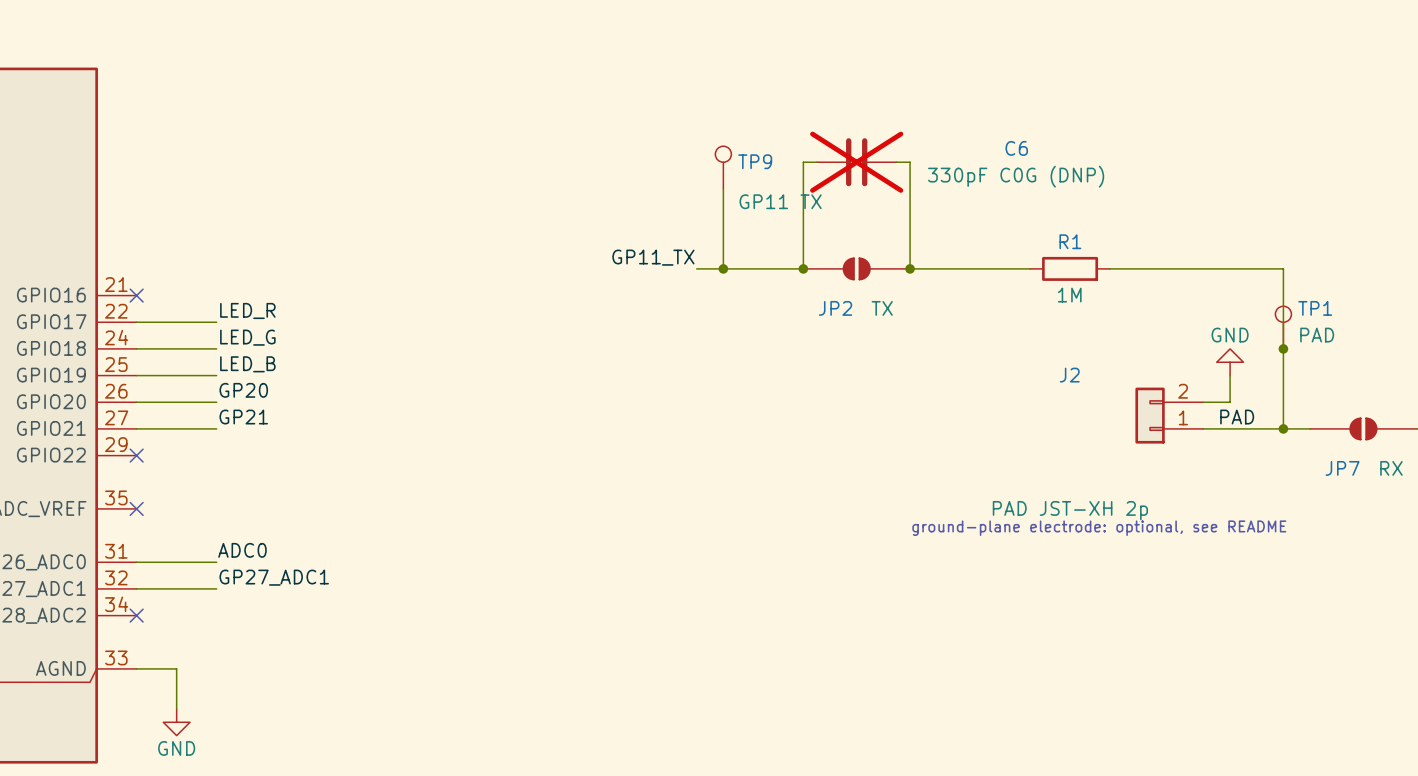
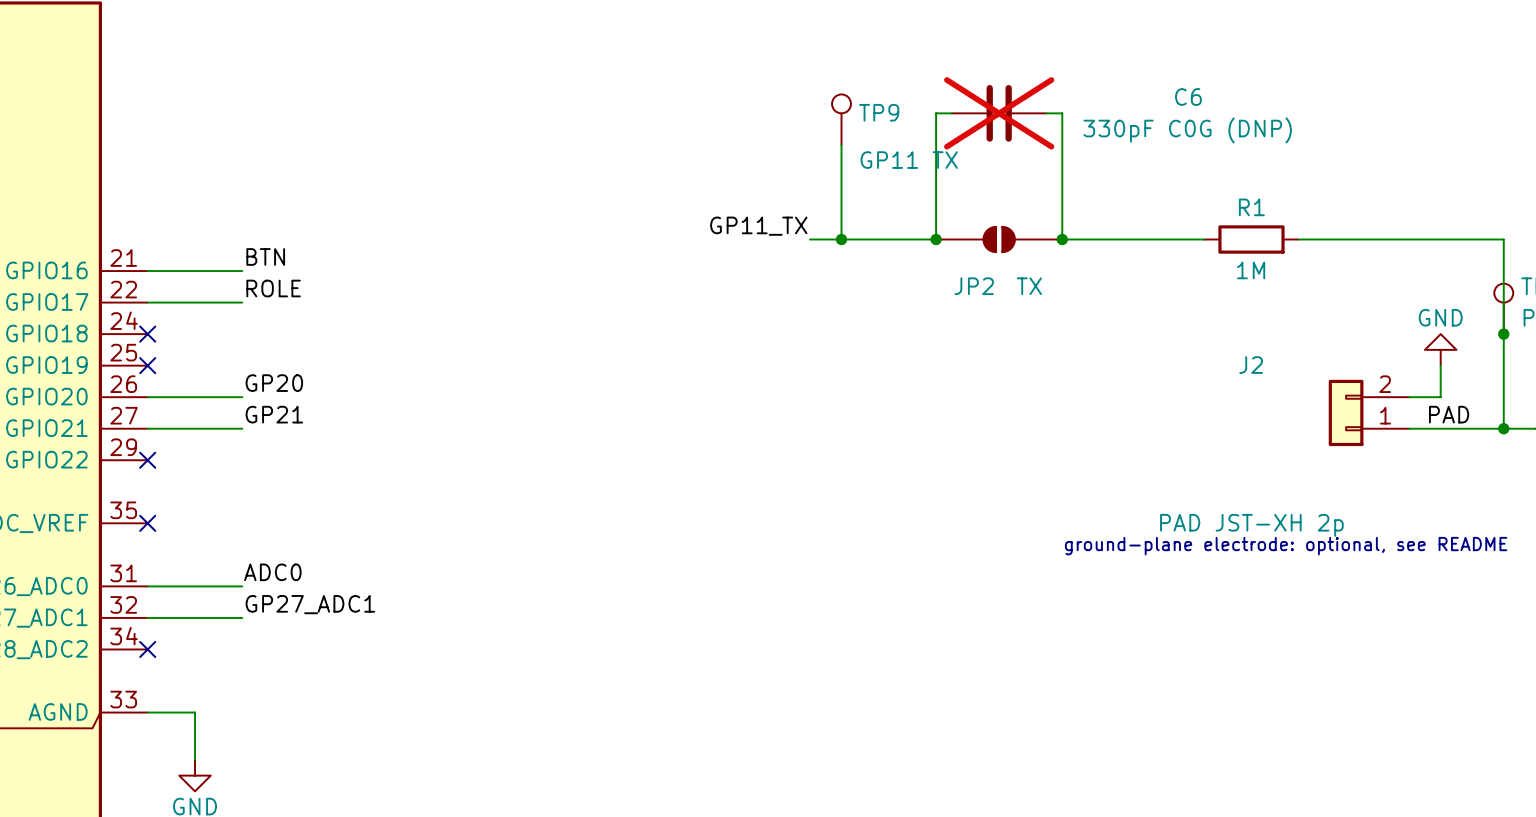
label: none -> BTN (265, 256)
no-connect mark: (136, 295) -> none
label: LED_R (247, 310) -> ROLE (273, 288)
label: LED_G (247, 337) -> none
wire: (136, 348) (216, 348) -> (147, 271) (242, 271)
no-connect mark: none -> (147, 334)
label: LED_B (247, 364) -> none
wire: (136, 375) (216, 375) -> none
no-connect mark: none -> (147, 365)

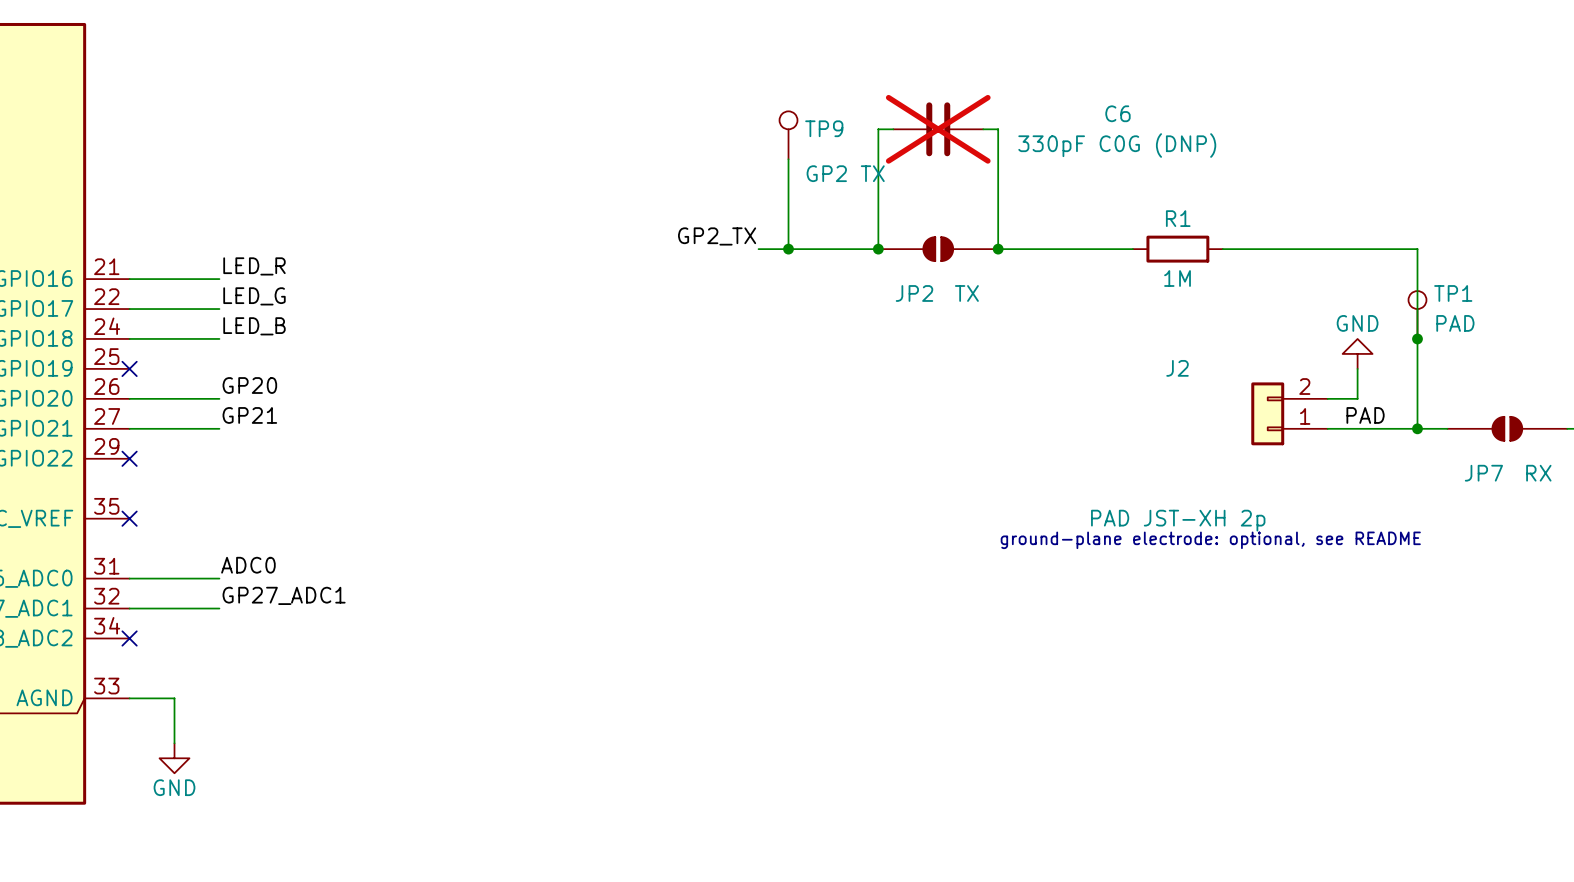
TP9 value: GP11 TX (909, 160) -> GP2 TX (845, 173)
label: GP11_TX (758, 226) -> GP2_TX (717, 236)
label: BTN (265, 256) -> LED_R (254, 266)
label: ROLE (273, 288) -> LED_G (254, 296)
label: none -> LED_B (254, 326)
wire: none -> (129, 338) (219, 338)
no-connect mark: (147, 334) -> none

